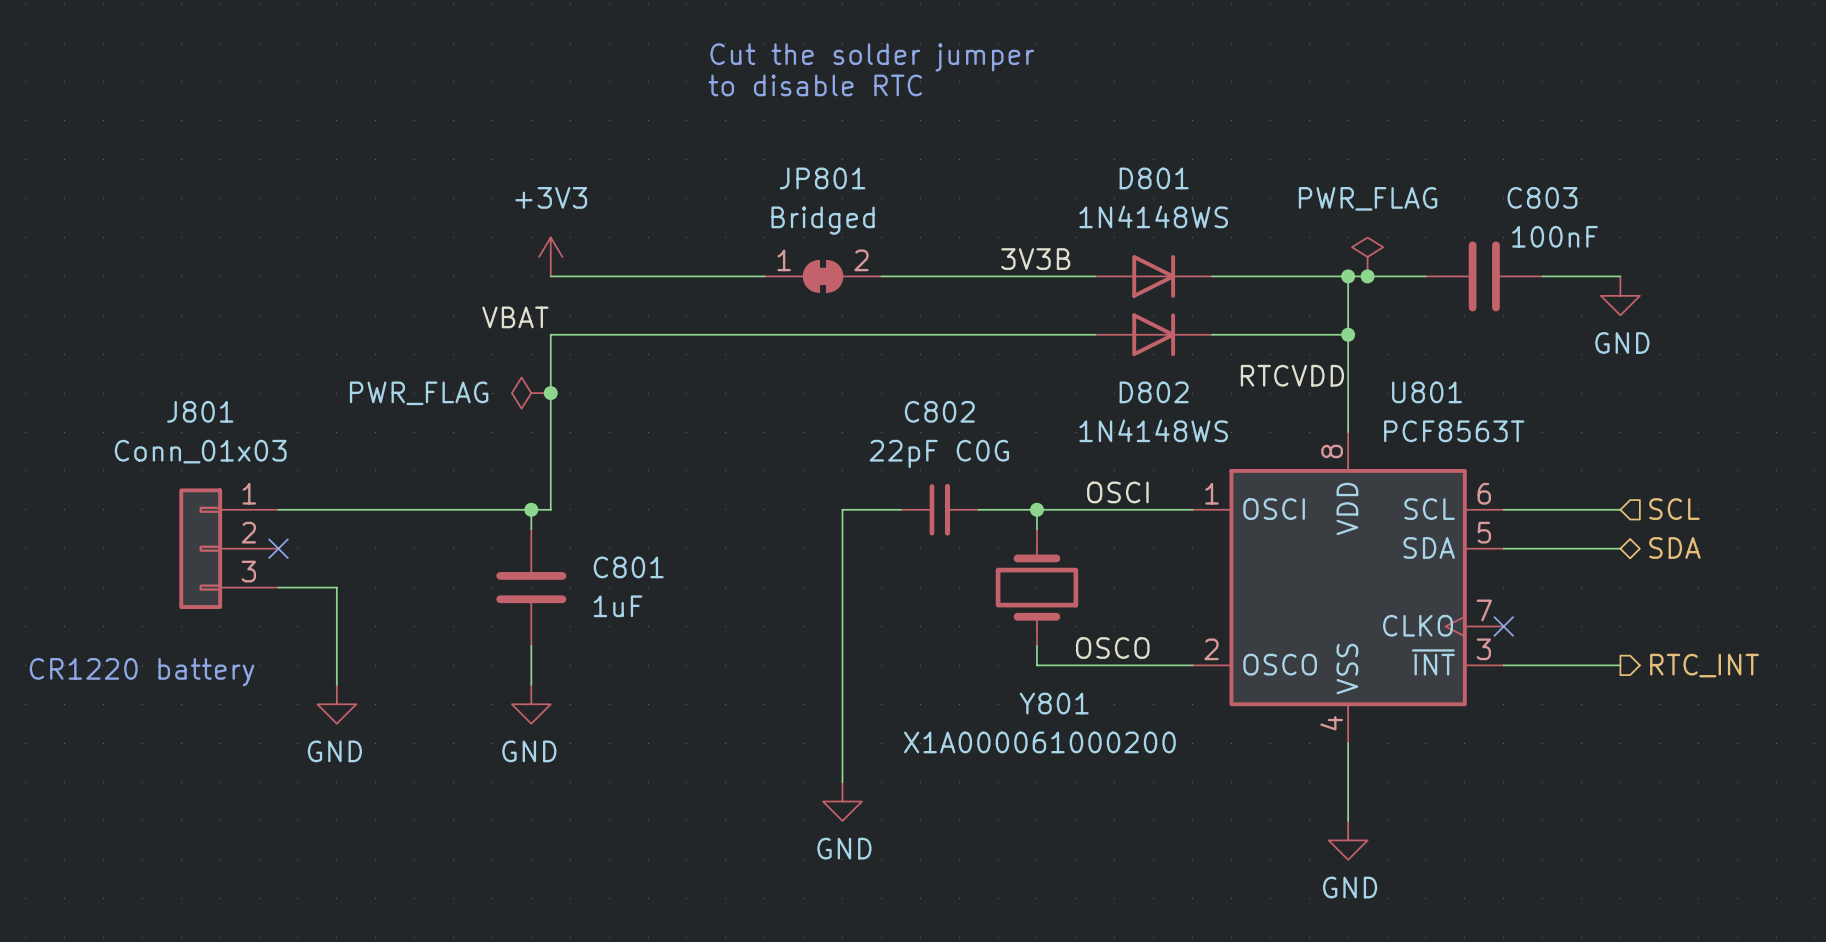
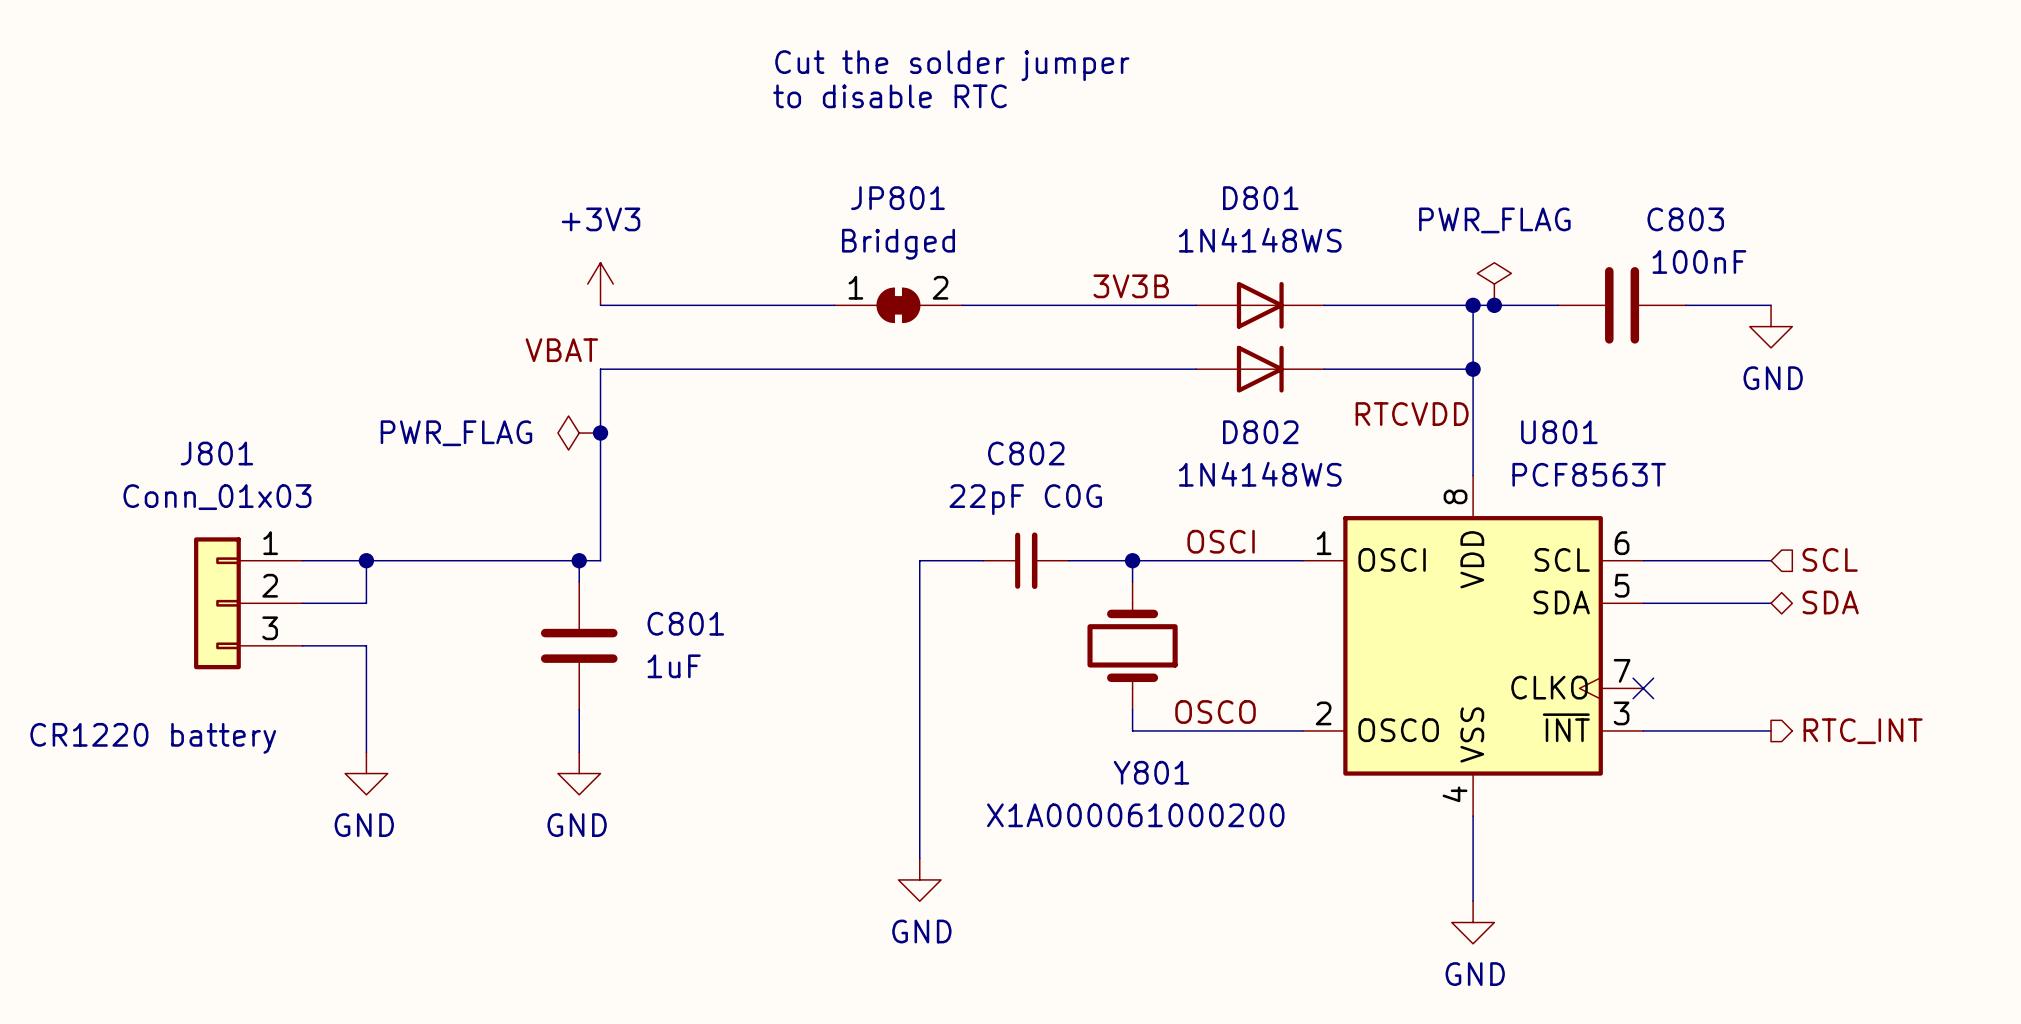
wire: none -> (366, 560) (366, 603) (302, 603)
junction: none -> (366, 560)
no-connect mark: (278, 548) -> none

